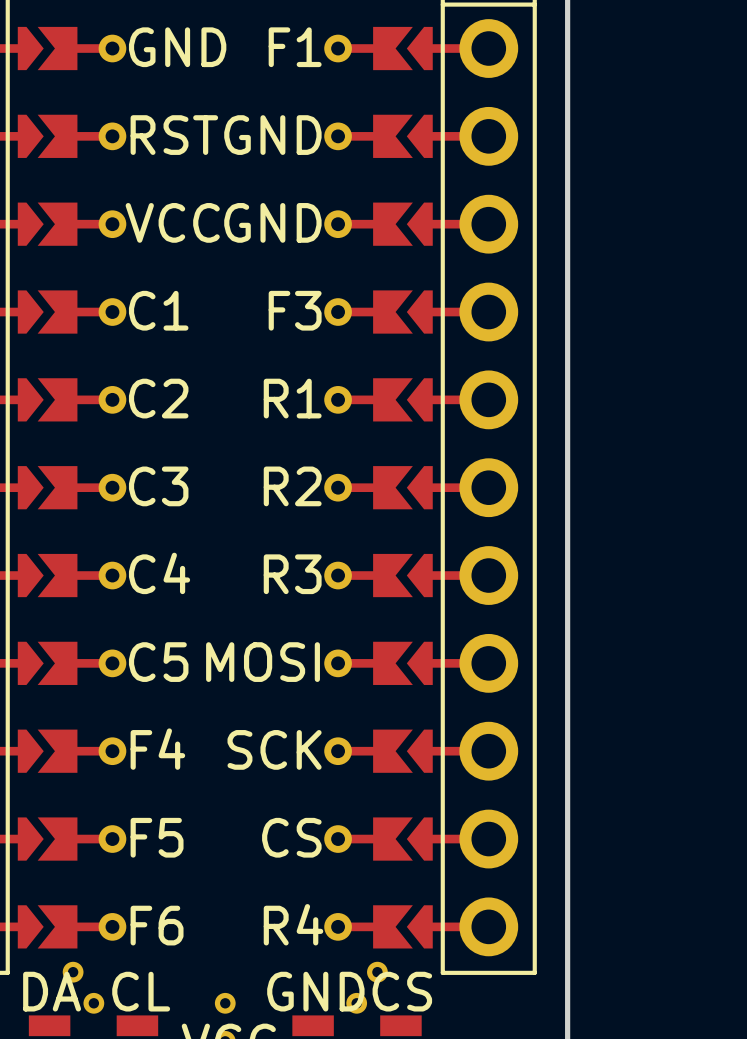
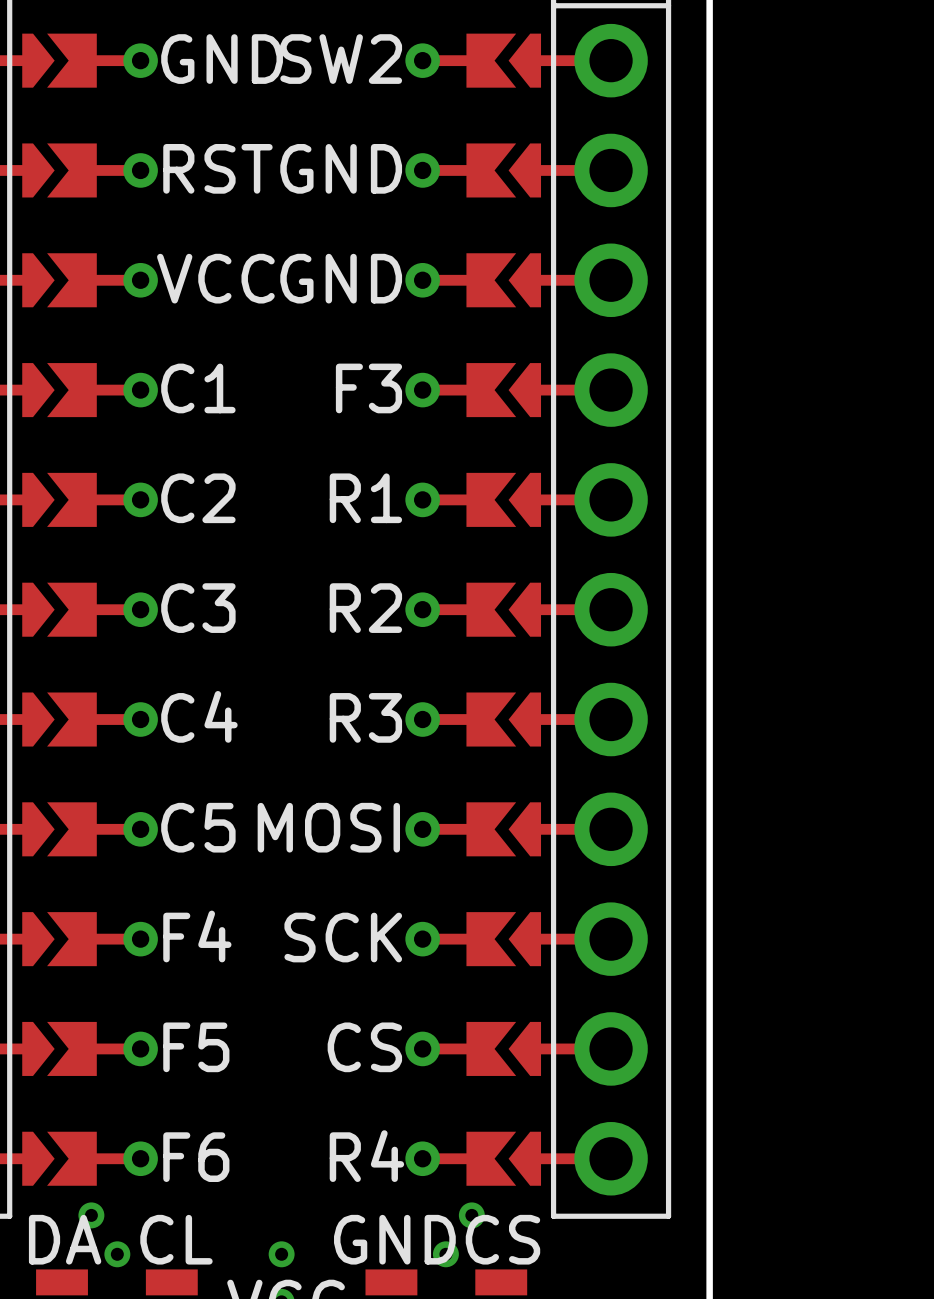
part text: F1 (295, 47) -> SW2 (341, 59)

